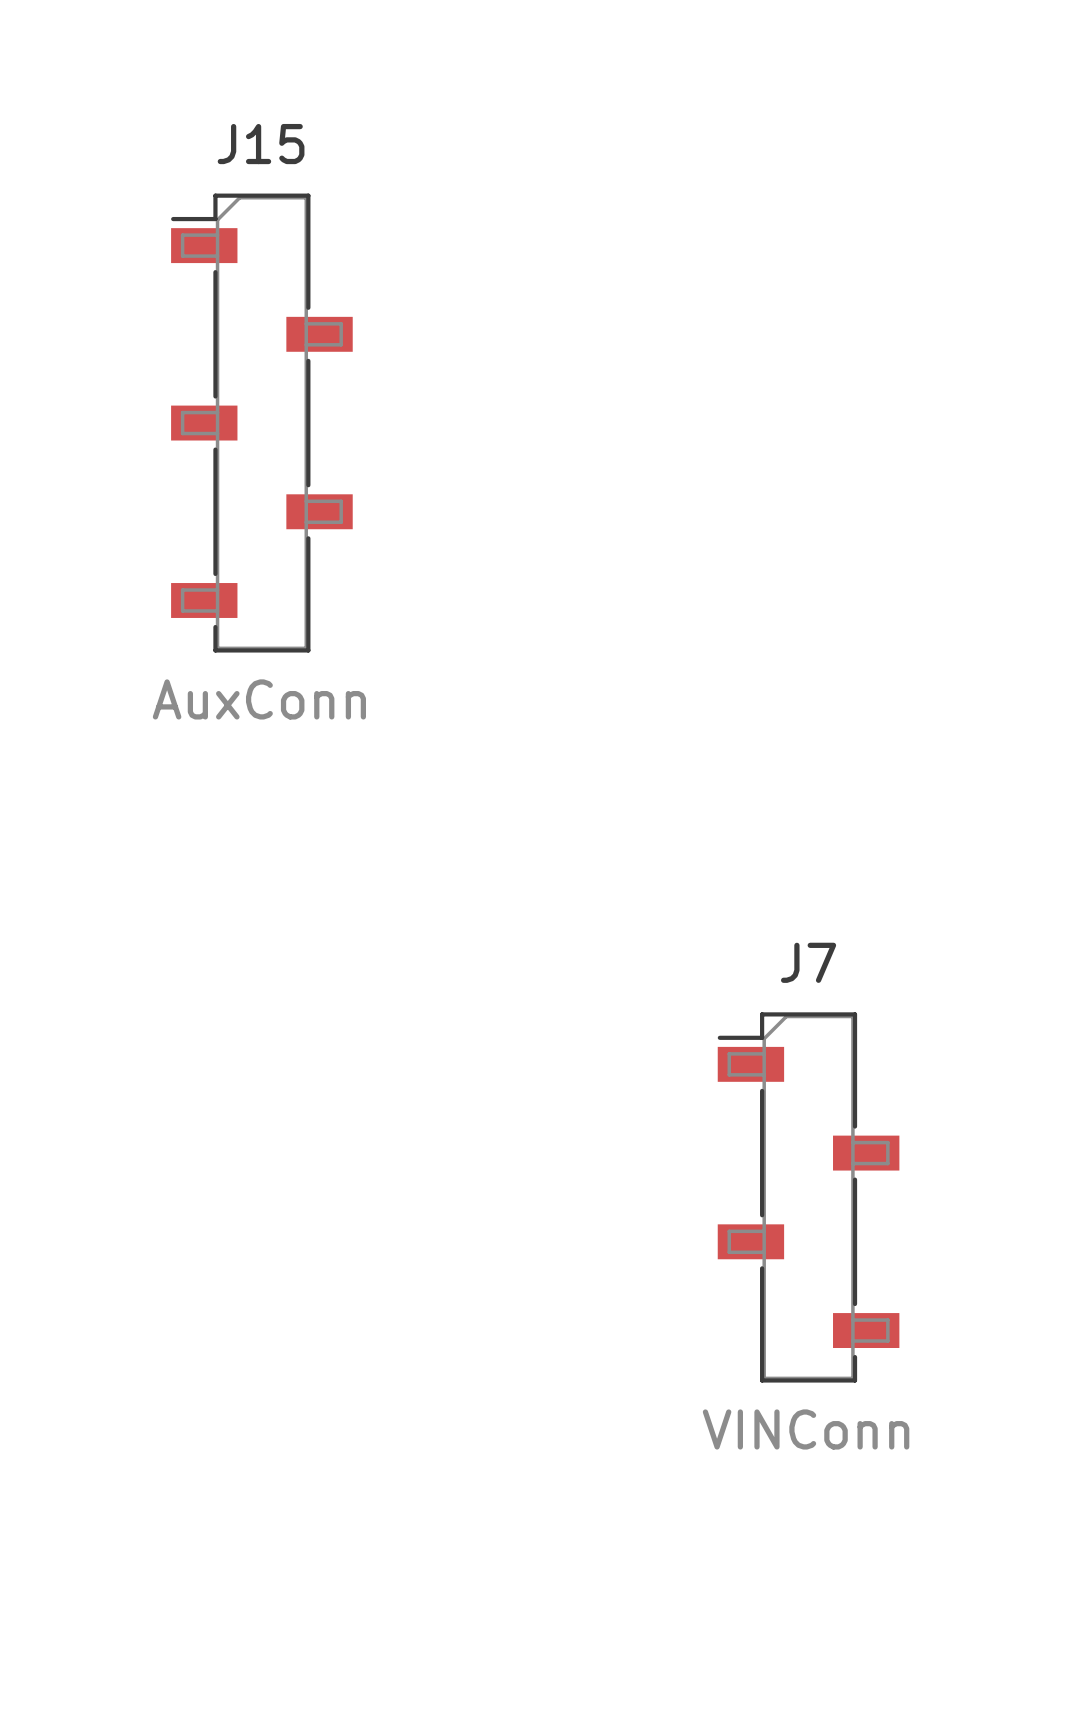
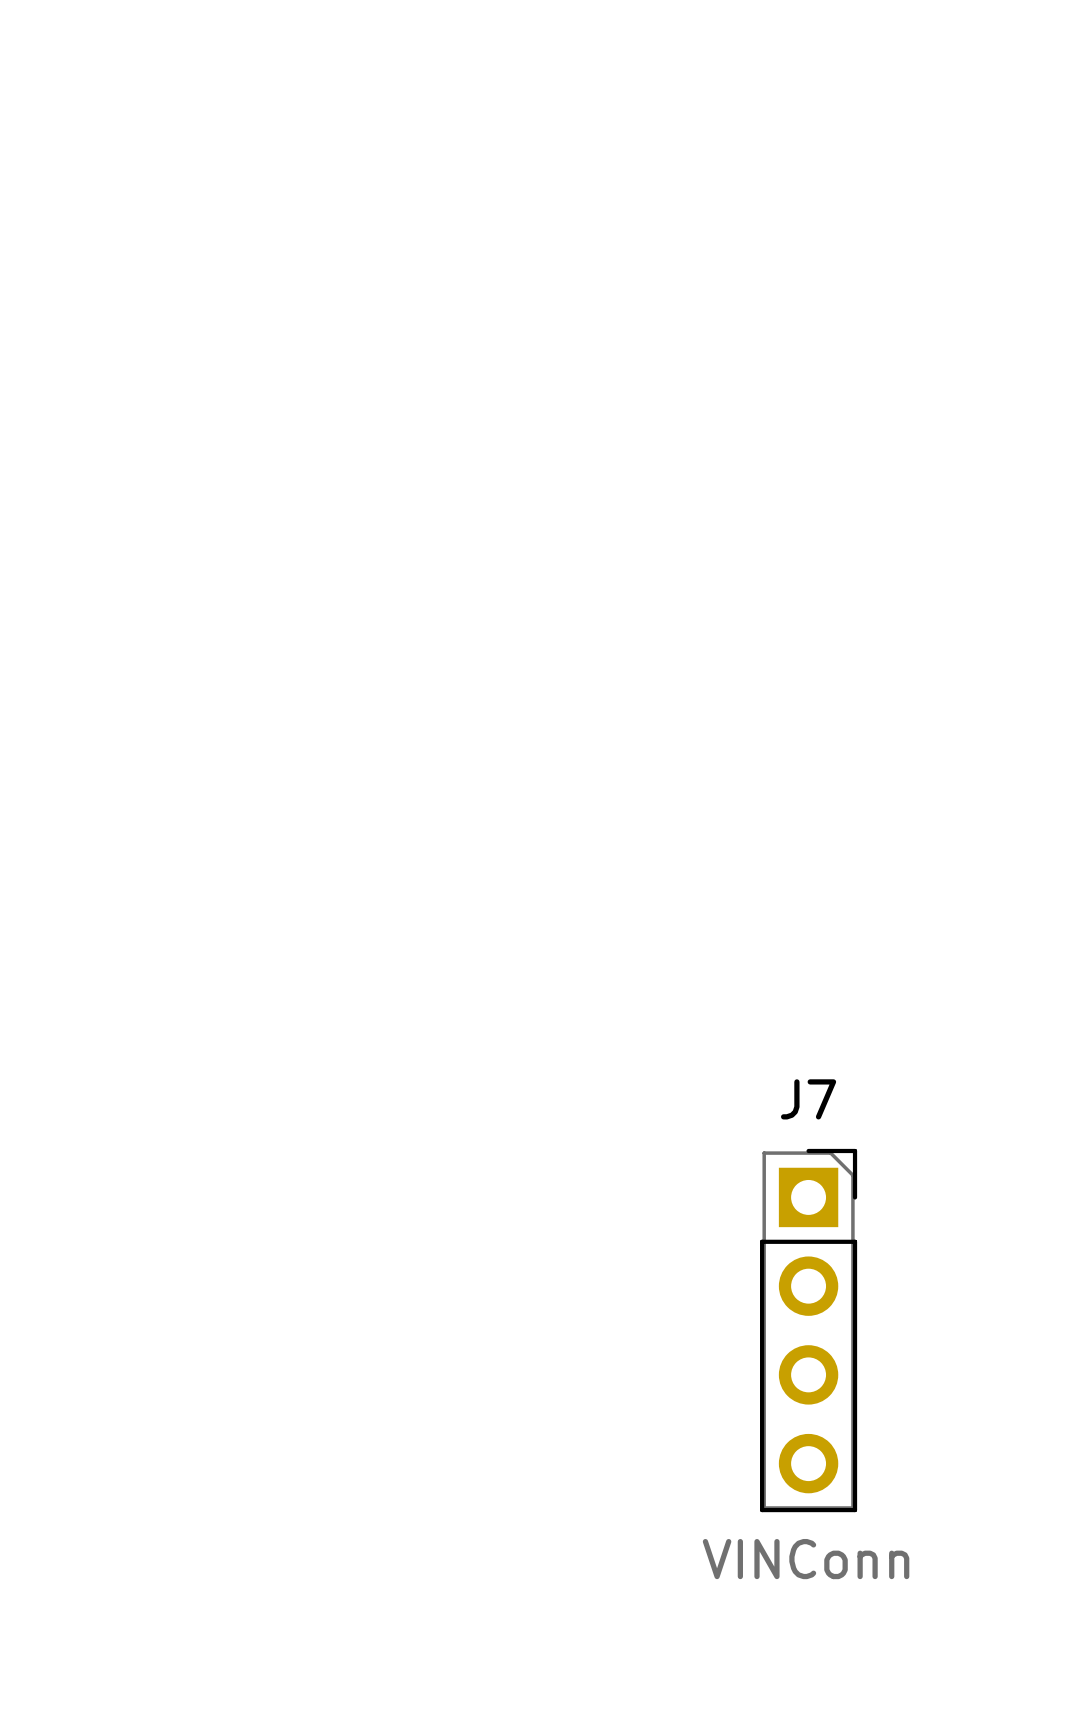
J15: AuxConn (261, 423) -> none
J7 footprint: [717, 1012, 900, 1383] -> [760, 1148, 858, 1513]

